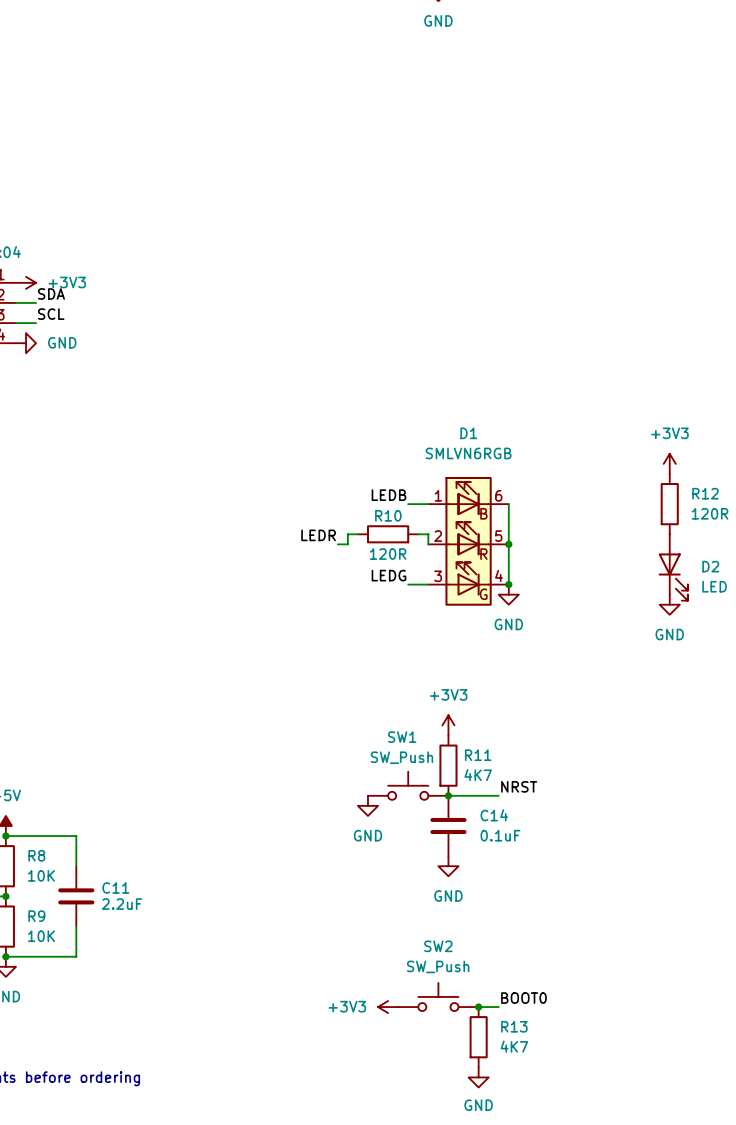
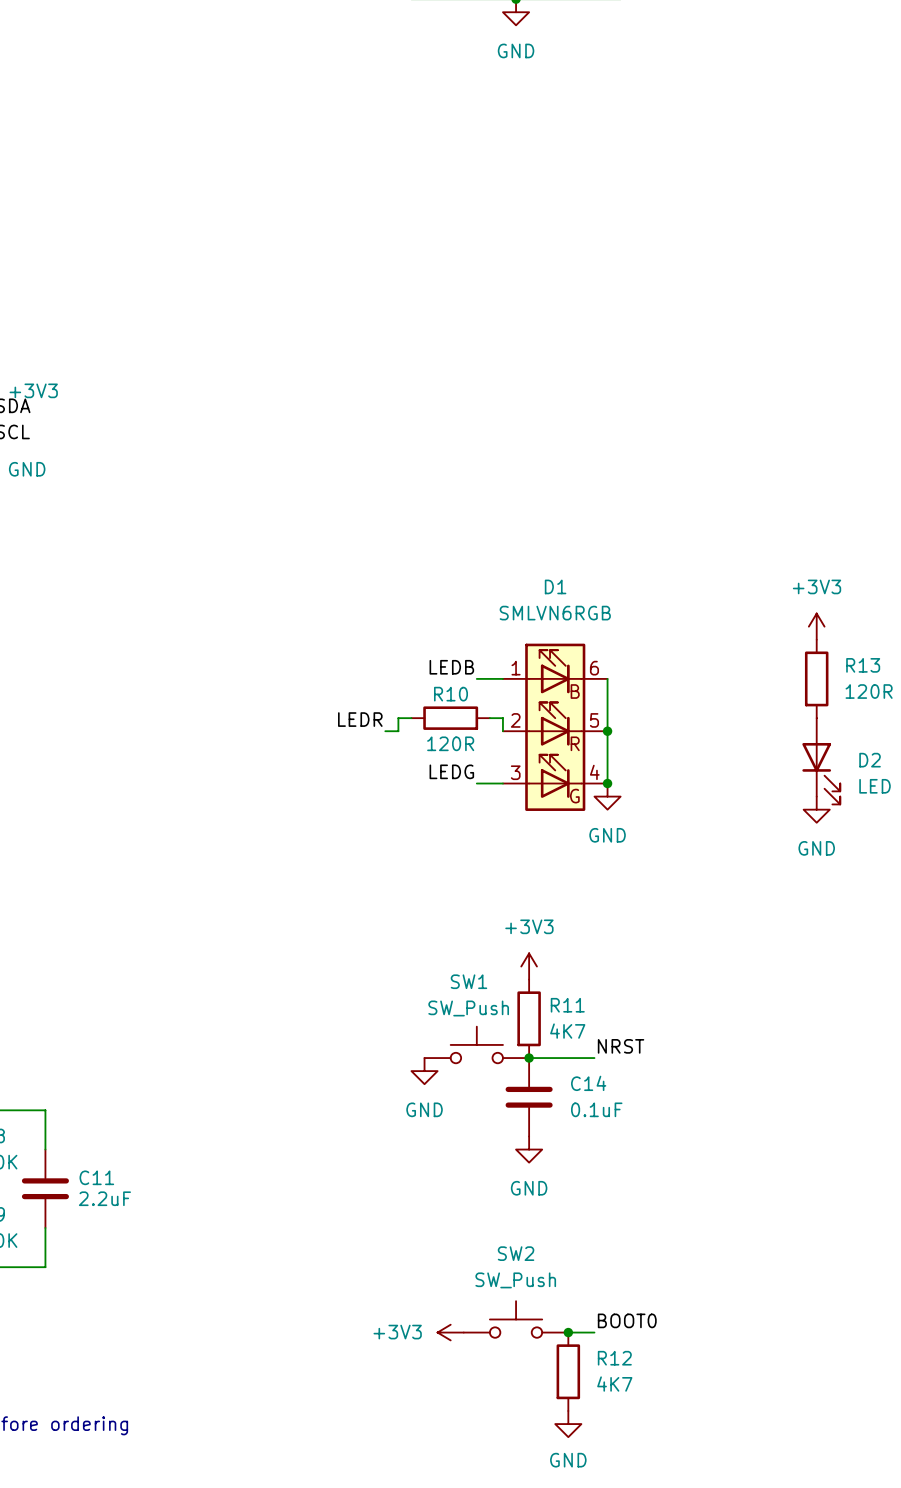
R12 name: R12 (705, 493) -> R13 (863, 665)
R13 name: R13 (514, 1026) -> R12 (614, 1358)

